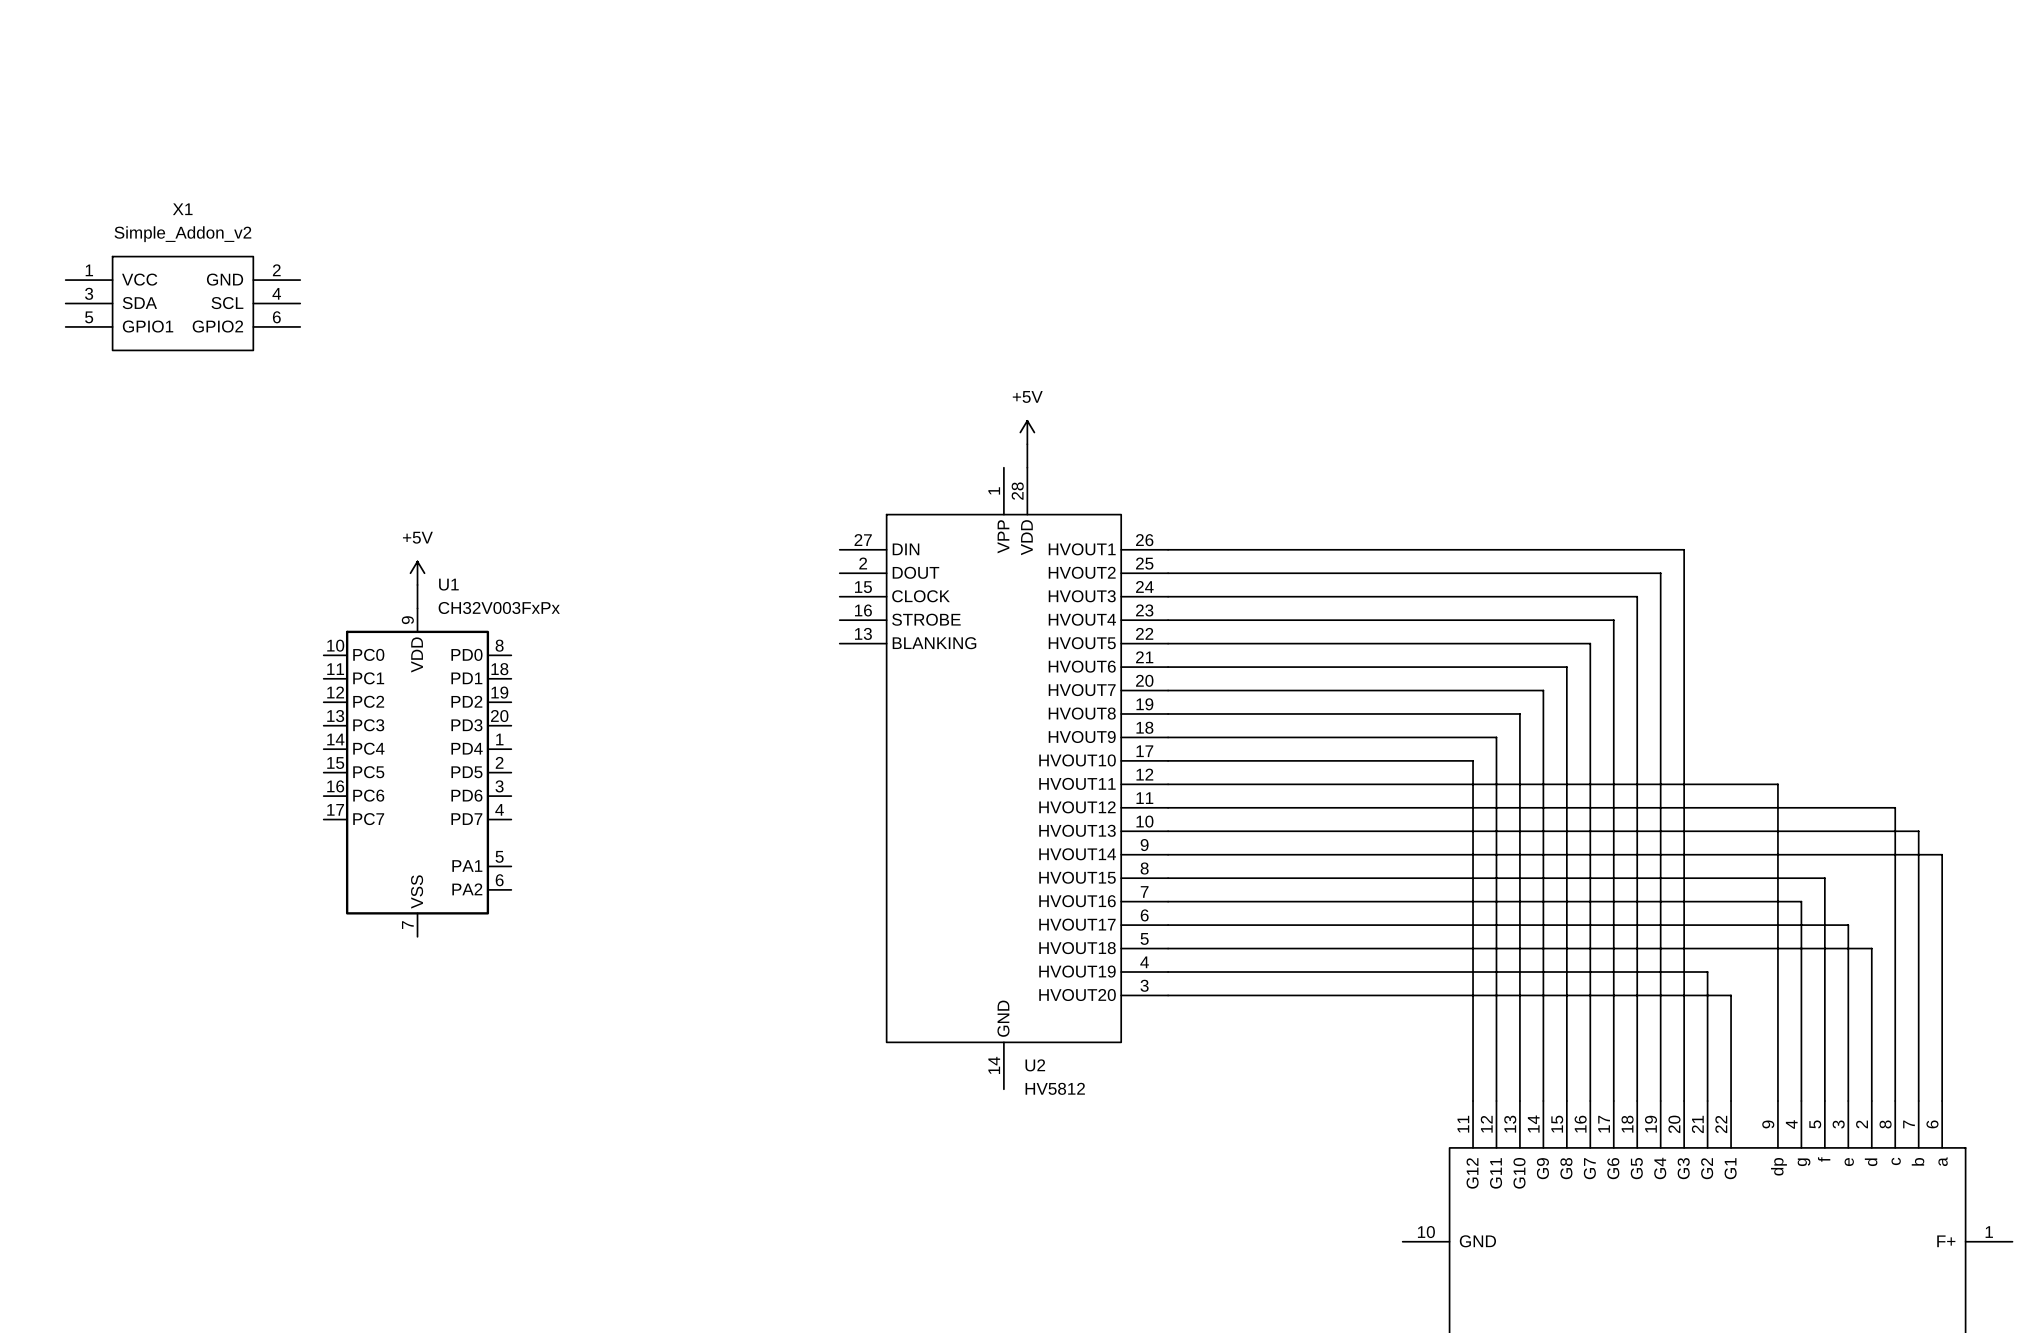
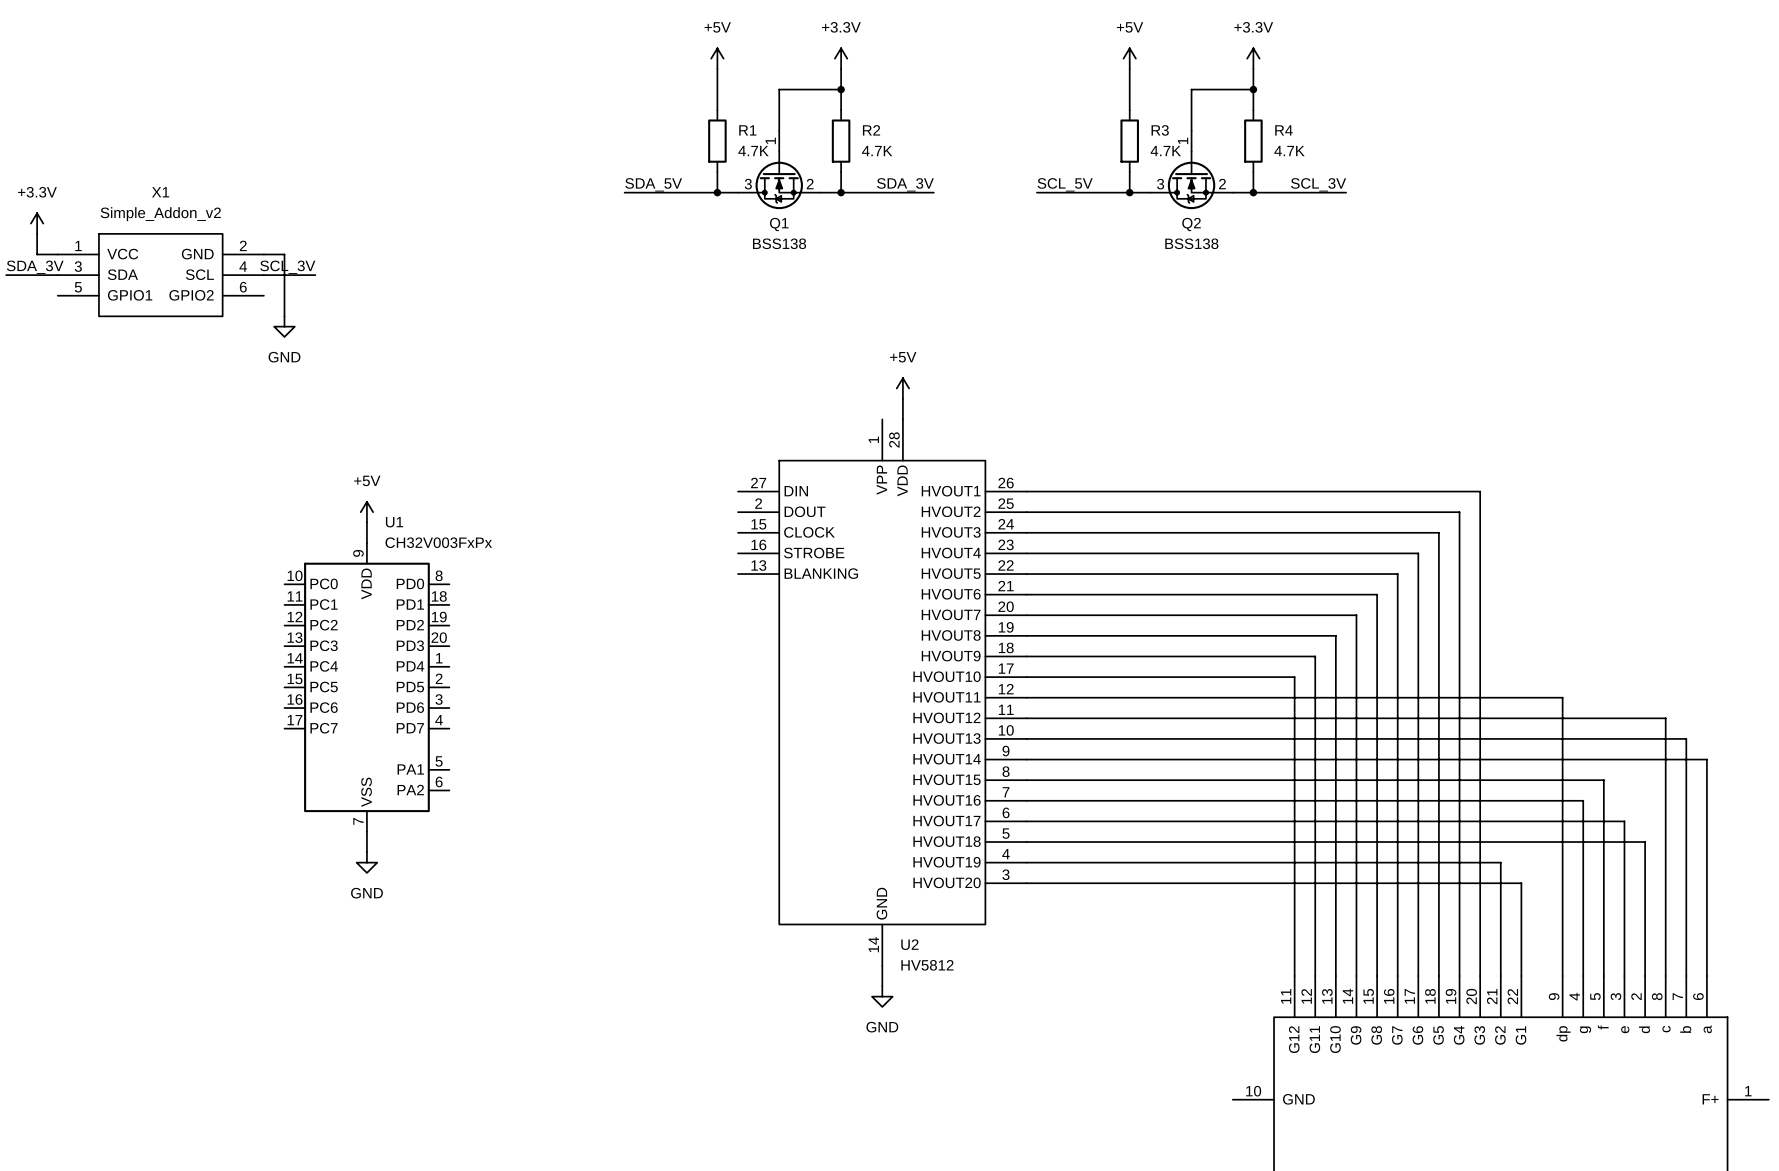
power symbol: none -> +5V (717, 58)
power symbol: none -> +3.3V (841, 58)
power symbol: none -> +5V (1129, 58)
power symbol: none -> +3.3V (1253, 58)
wire: none -> (717, 68) (717, 110)
wire: none -> (841, 68) (841, 110)
wire: none -> (1129, 68) (1129, 110)
wire: none -> (1253, 68) (1253, 110)
wire: none -> (841, 89) (779, 89) (779, 130)
junction: none -> (841, 89)
wire: none -> (1253, 89) (1191, 89) (1191, 130)
junction: none -> (1253, 89)
R1: none -> 4.7K (717, 141)
R2: none -> 4.7K (841, 141)
R3: none -> 4.7K (1129, 141)
R4: none -> 4.7K (1253, 141)
Q1: none -> BSS138 (779, 169)
Q2: none -> BSS138 (1191, 169)
wire: none -> (717, 172) (717, 192)
wire: none -> (841, 172) (841, 192)
wire: none -> (1129, 172) (1129, 192)
wire: none -> (1253, 172) (1253, 192)
label: none -> SDA_5V (653, 184)
label: none -> SDA_3V (905, 184)
label: none -> SCL_5V (1065, 184)
label: none -> SCL_3V (1318, 184)
wire: none -> (624, 192) (738, 192)
junction: none -> (717, 192)
wire: none -> (820, 192) (933, 192)
junction: none -> (841, 192)
wire: none -> (1036, 192) (1150, 192)
junction: none -> (1129, 192)
wire: none -> (1232, 192) (1346, 192)
junction: none -> (1253, 192)
power symbol: none -> +3.3V (37, 223)
wire: none -> (37, 233) (37, 254) (57, 254)
wire: none -> (263, 254) (284, 254) (284, 316)
label: none -> SDA_3V (35, 267)
label: none -> SCL_3V (287, 267)
wire: none -> (6, 275) (57, 275)
wire: none -> (263, 275) (315, 275)
power symbol: none -> GND (284, 326)
wire: none -> (366, 831) (366, 852)
power symbol: none -> GND (366, 862)
wire: none -> (882, 965) (882, 986)
power symbol: none -> GND (882, 996)

